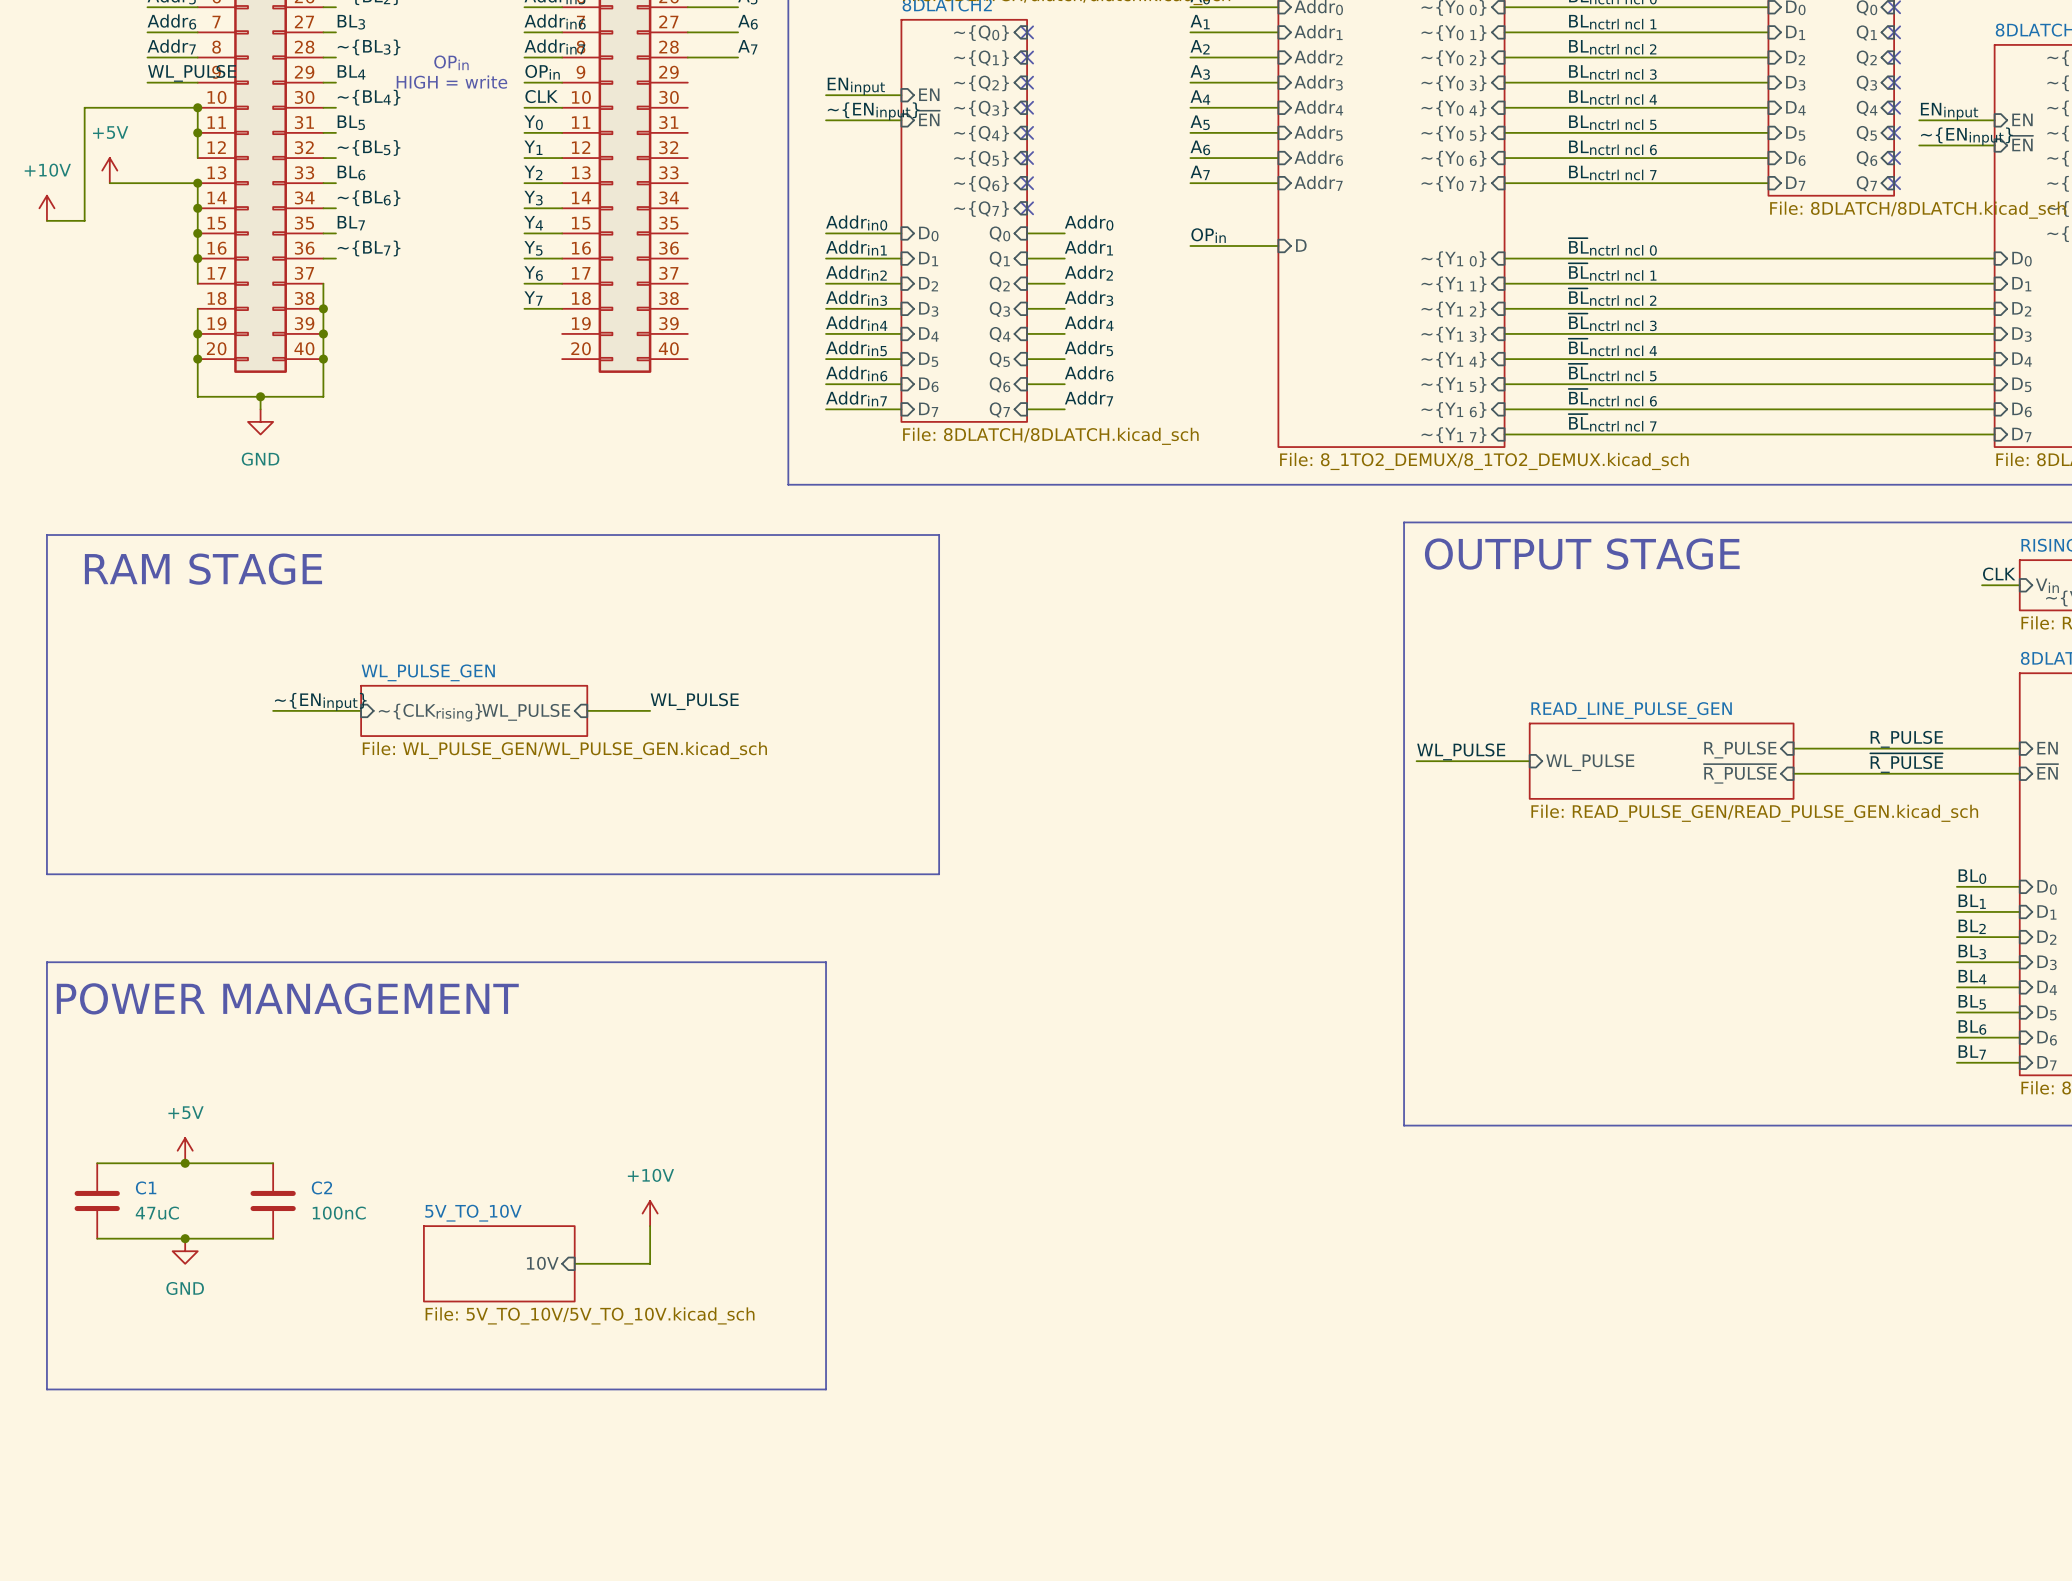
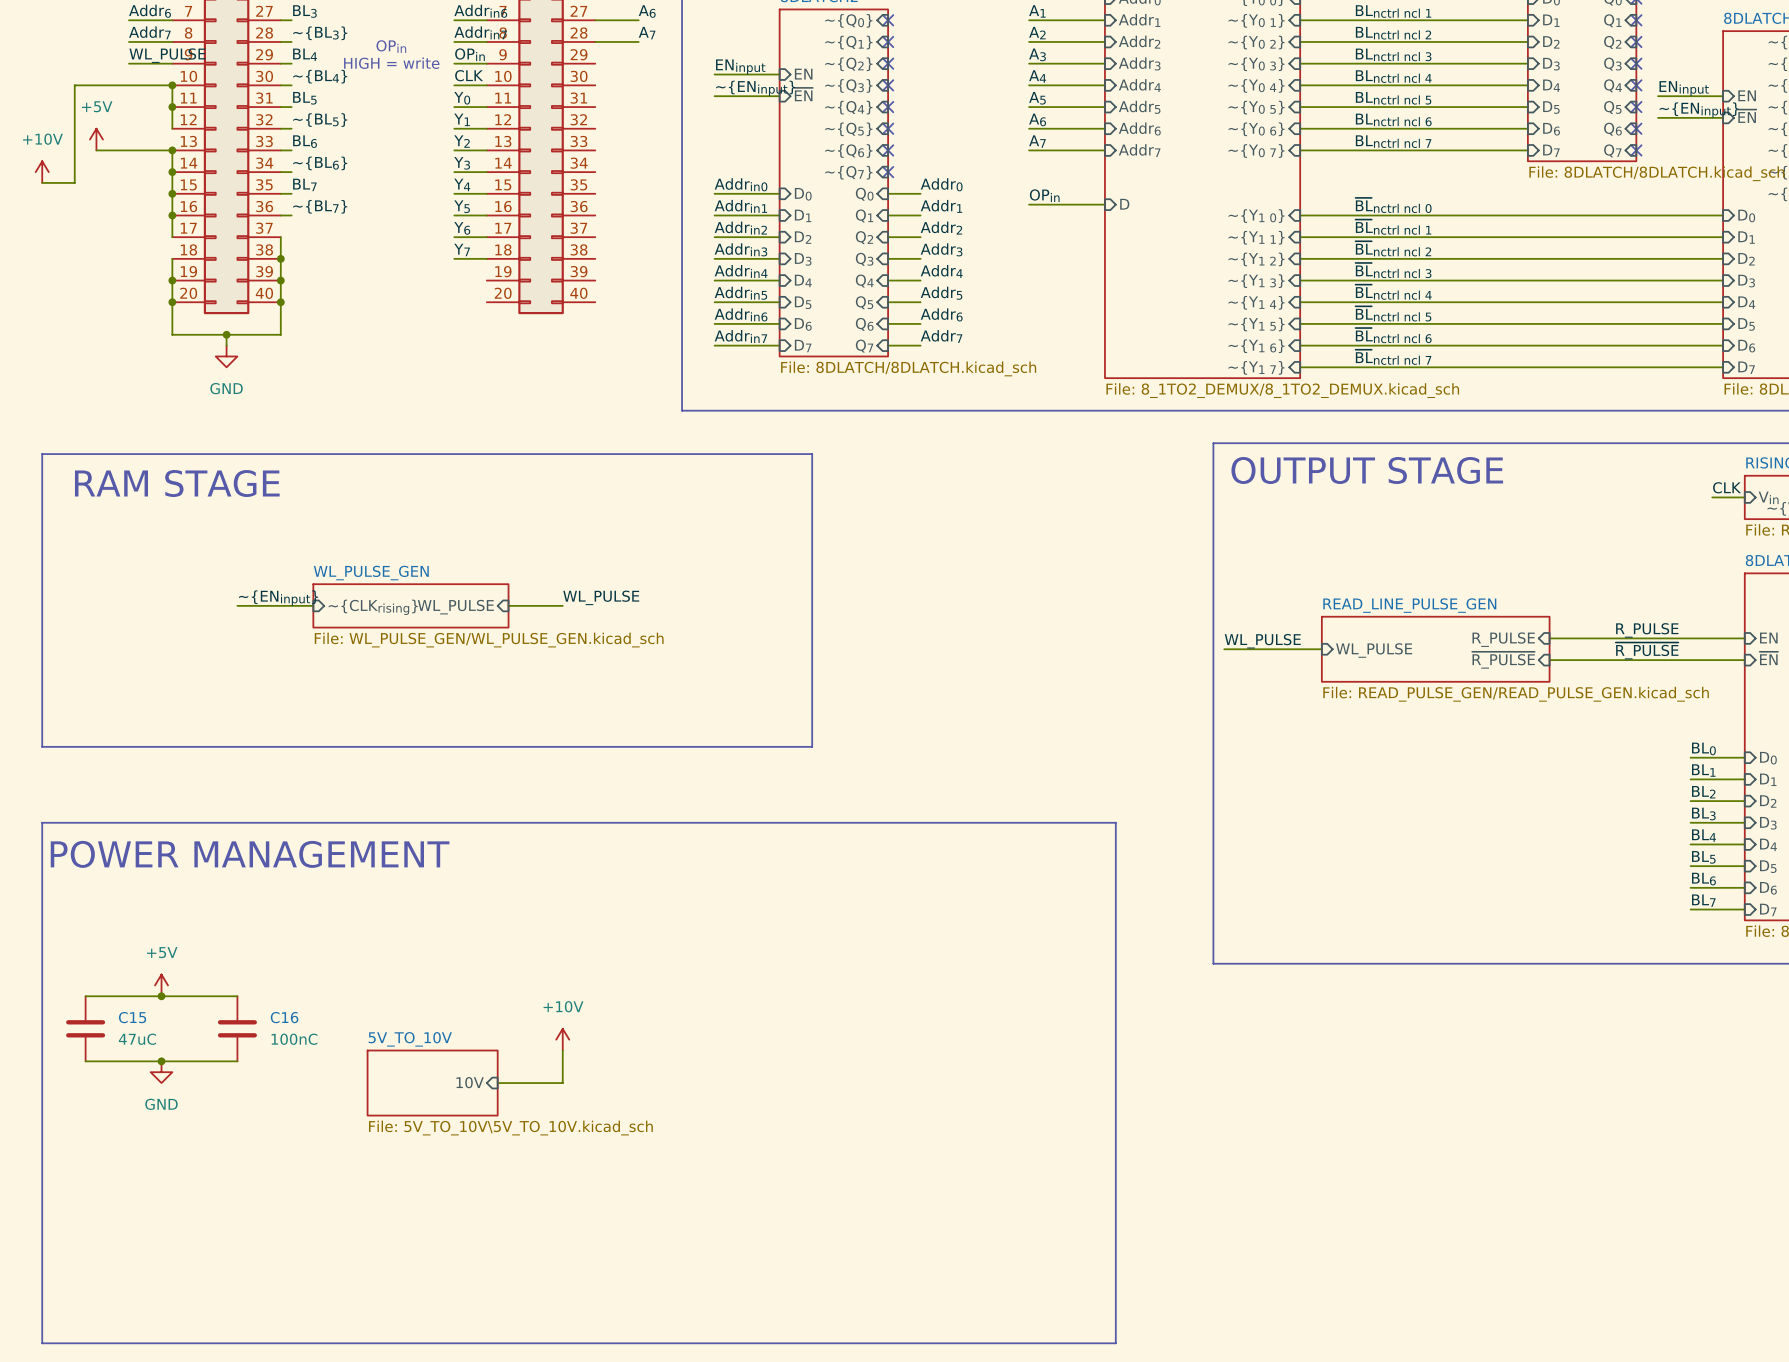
line: (826, 962) (826, 1389) (46, 1389) -> (714, 822) (1115, 822) (1115, 1343) (42, 1343) (42, 1191)
C1 name: C1 (146, 1187) -> C15 (132, 1017)
C2 name: C2 (321, 1187) -> C16 (284, 1017)
sheet 5V_TO_10V value: File: 5V_TO_10V/5V_TO_10V.kicad_sch (590, 1315) -> File: 5V_TO_10V\5V_TO_10V.kicad_sch (510, 1128)

